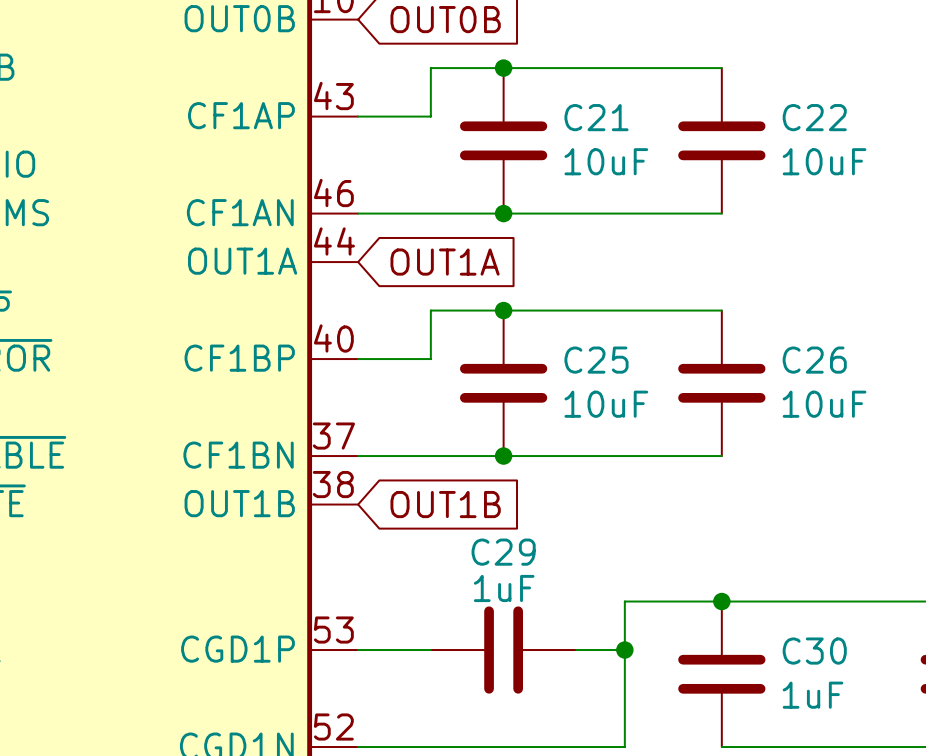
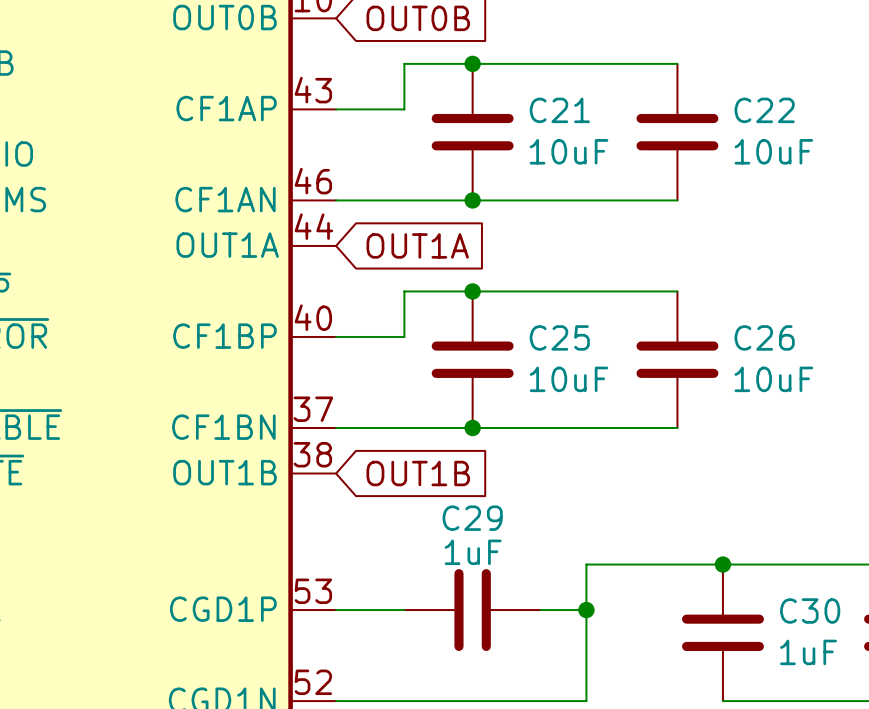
junction position: (721, 601) -> (722, 564)
C30 position: (721, 674) -> (722, 632)
wire: (721, 747) (770, 747) -> none

